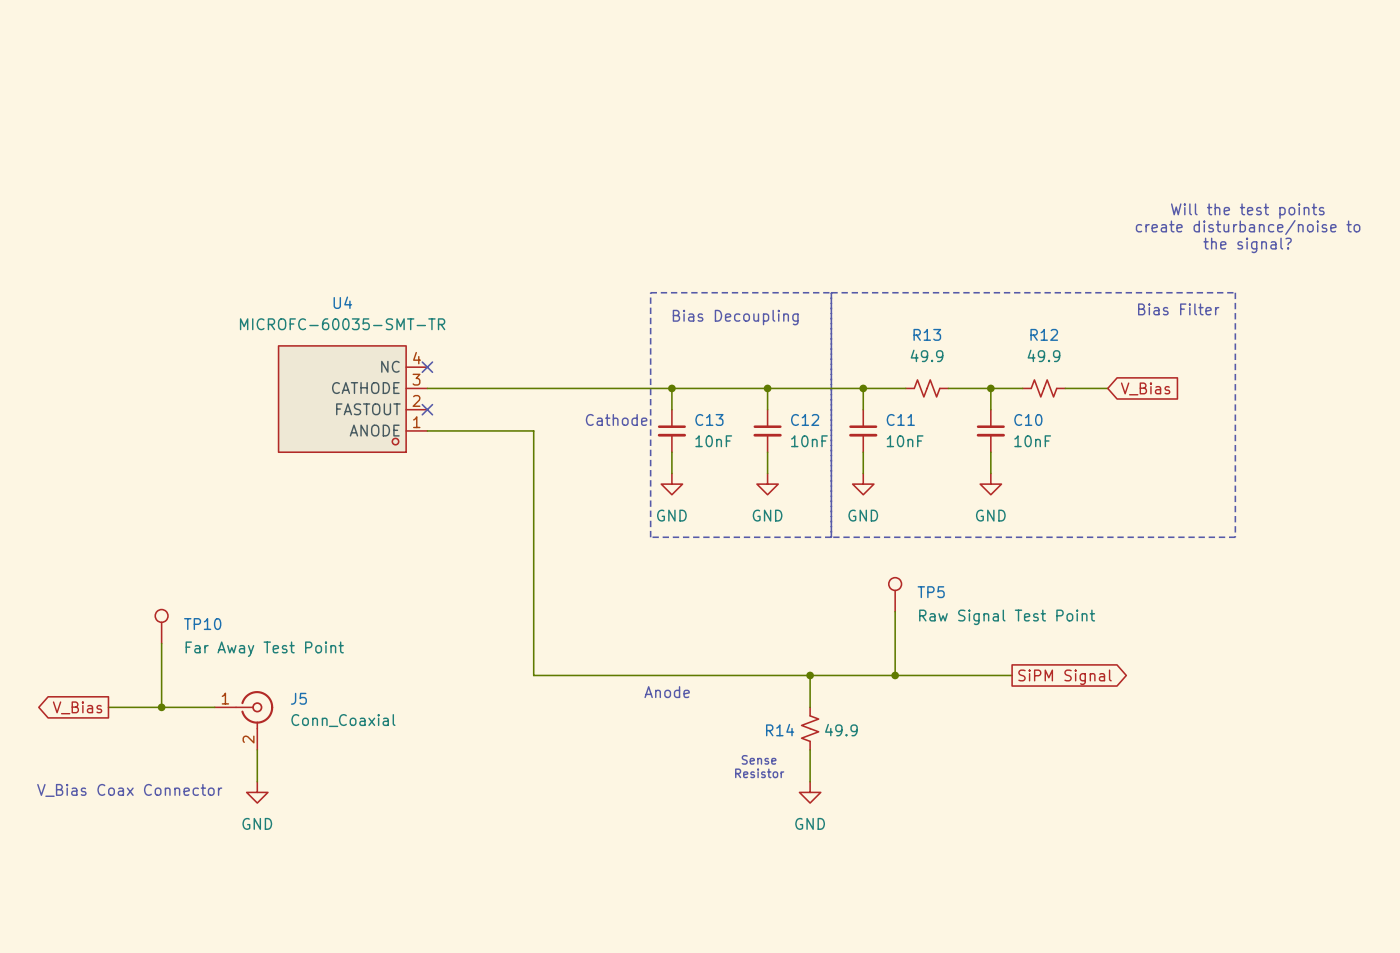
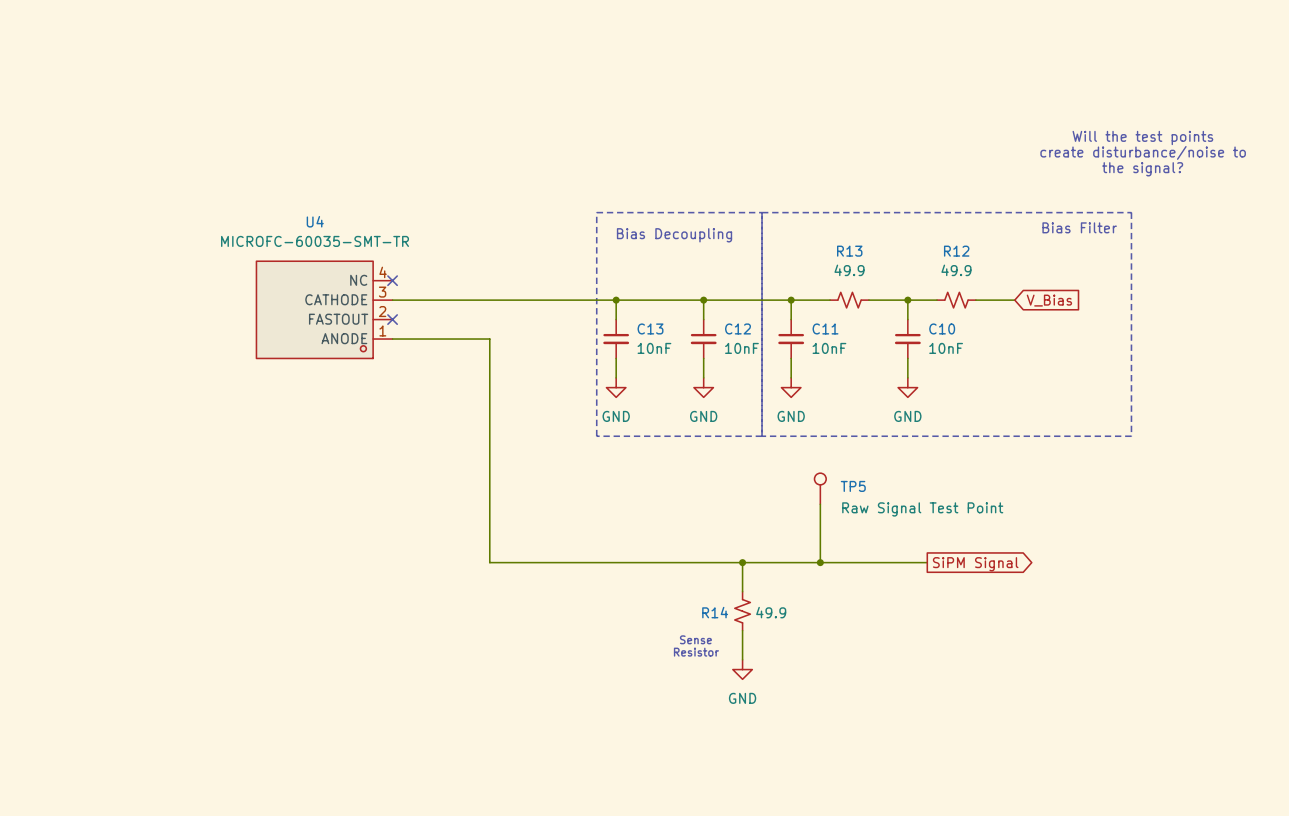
text: Cathode (616, 419) -> none
TP10: Far Away Test Point (161, 626) -> none
wire: (161, 643) (161, 707) -> none
text: Anode (667, 692) -> none
global label: V_Bias (77, 707) -> none
wire: (108, 707) (214, 707) -> none
junction: (161, 707) -> none
J5: Conn_Coaxial (244, 720) -> none
wire: (257, 749) (257, 781) -> none
text: V_Bias Coax Connector (129, 790) -> none
power symbol: GND (257, 792) -> none

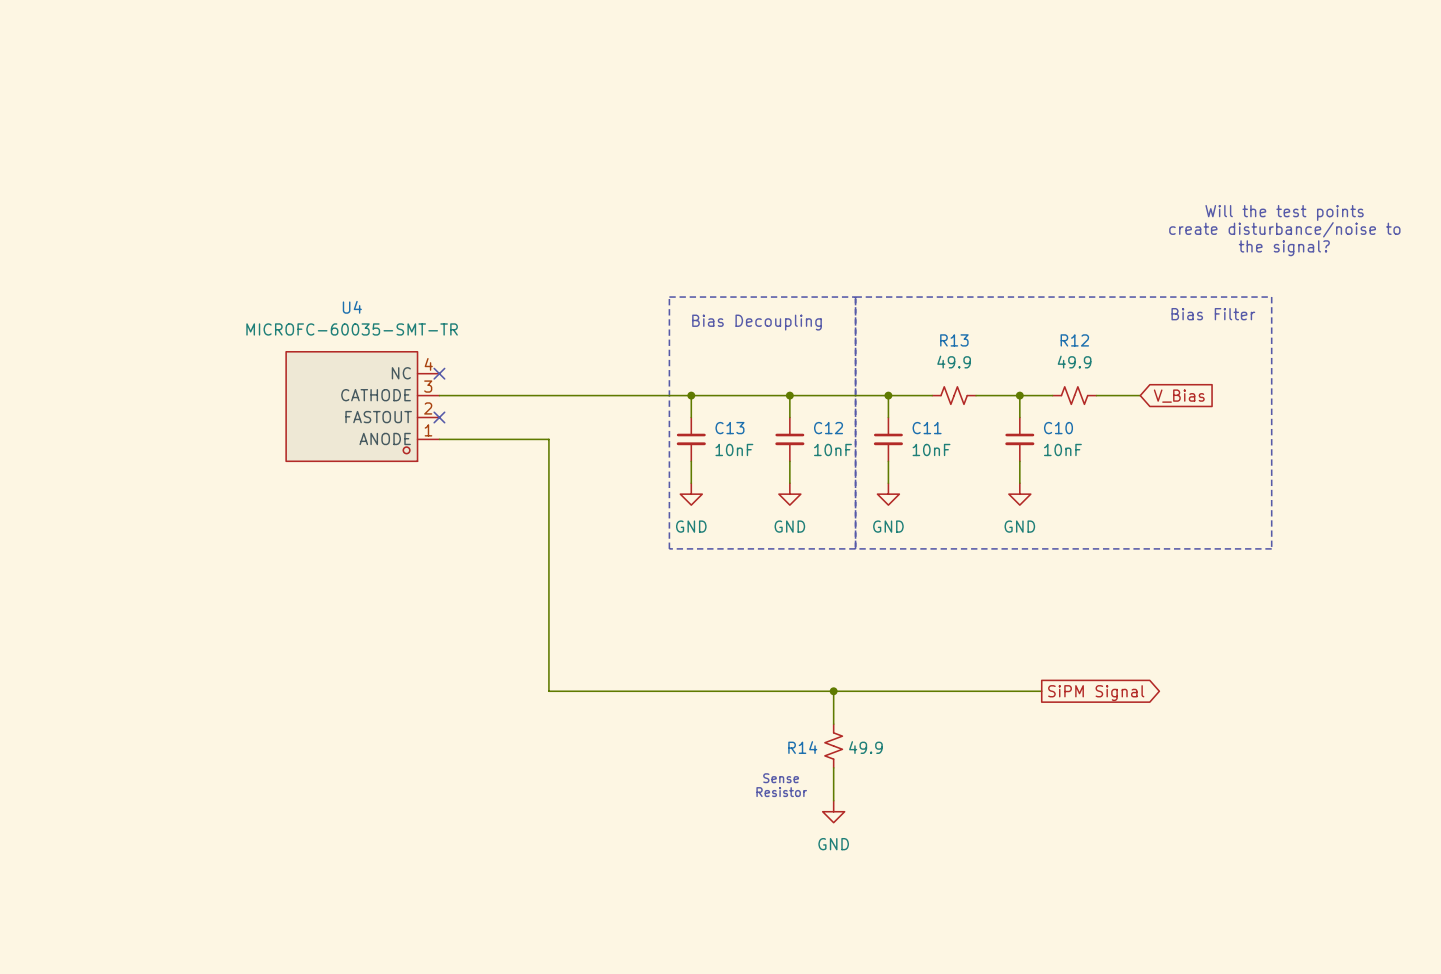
TP5: Raw Signal Test Point (820, 488) -> none
wire: (820, 504) (820, 562) -> none
junction: (820, 562) -> none

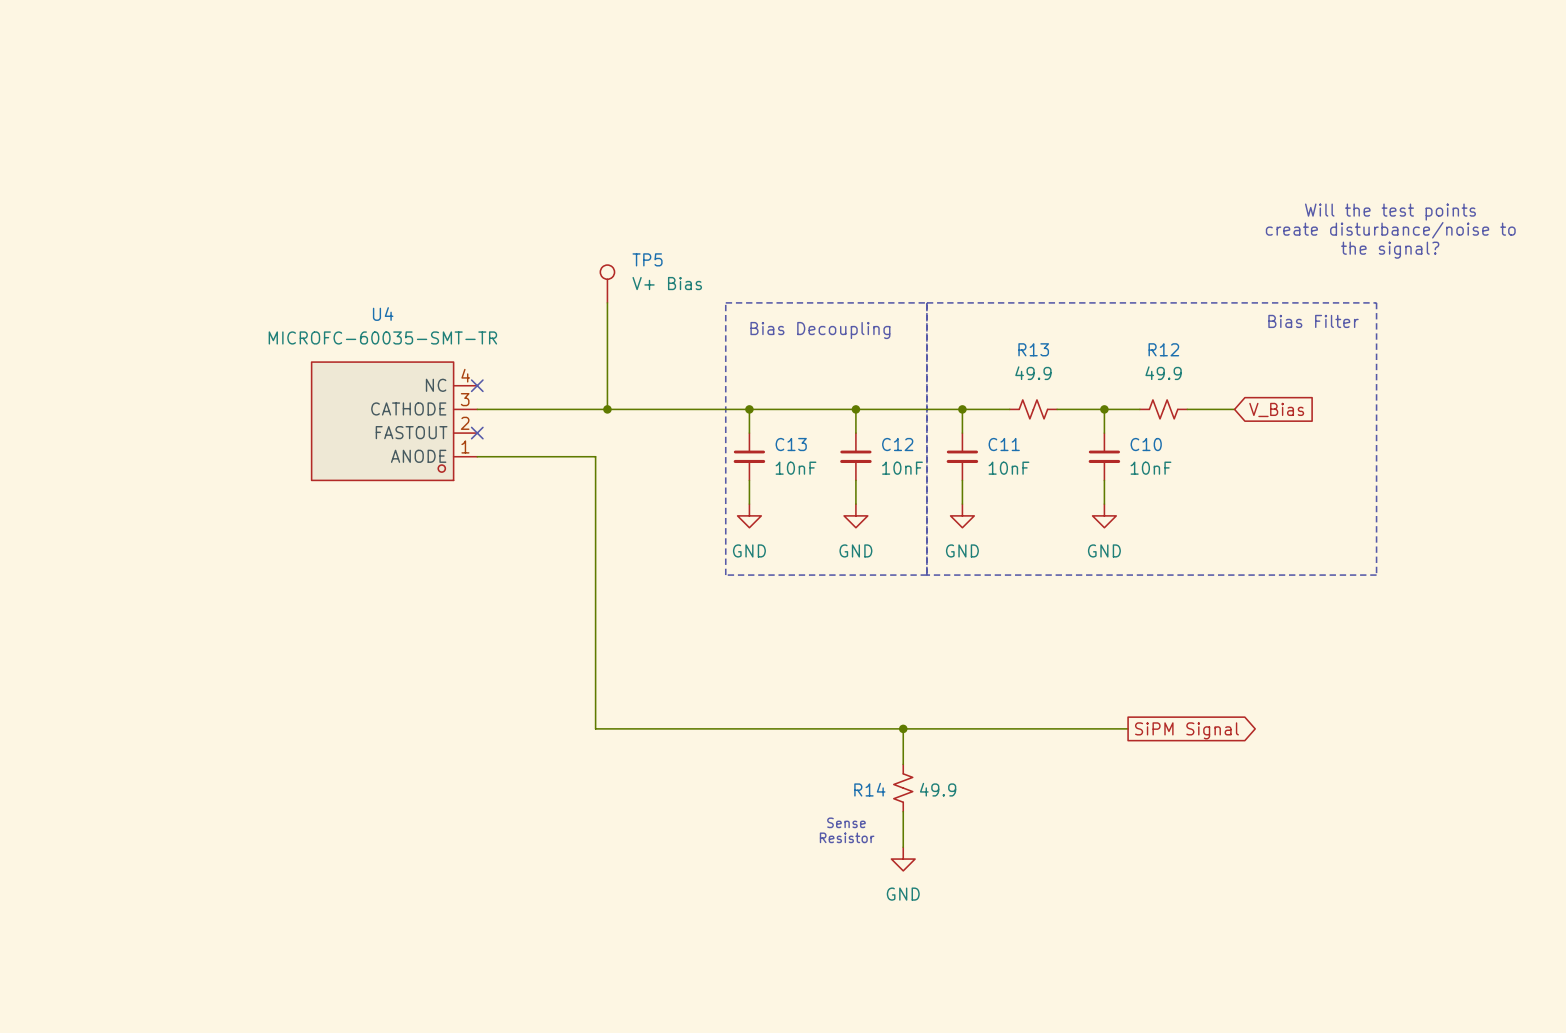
TP5: none -> V+ Bias (607, 283)
wire: none -> (607, 302) (607, 409)
junction: none -> (607, 409)

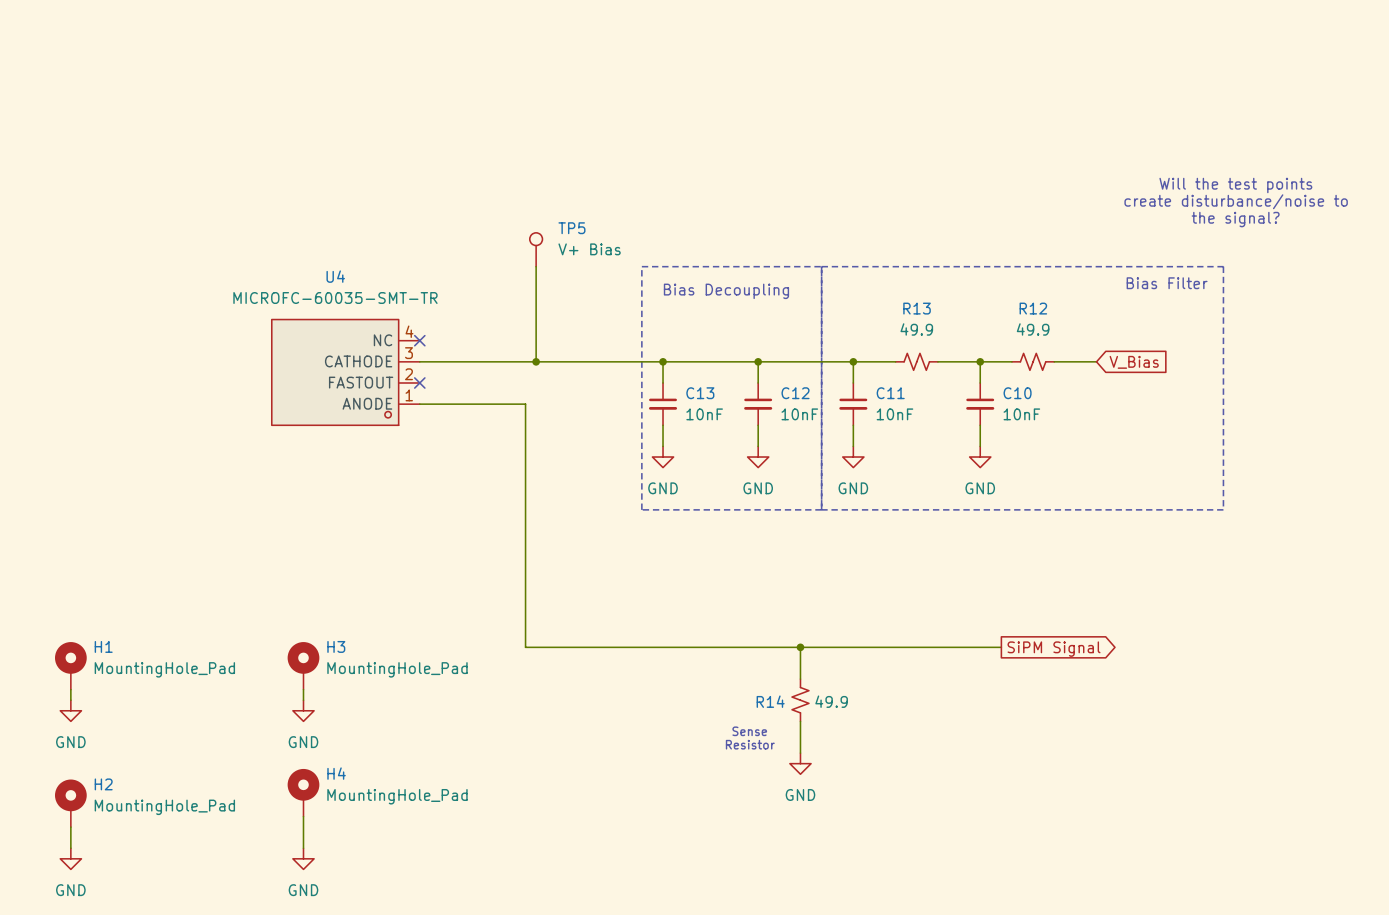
H1: none -> MountingHole_Pad (70, 665)
H3: none -> MountingHole_Pad (303, 665)
wire: none -> (70, 689) (70, 700)
wire: none -> (303, 689) (303, 700)
power symbol: none -> GND (70, 710)
power symbol: none -> GND (303, 710)
H4: none -> MountingHole_Pad (303, 792)
H2: none -> MountingHole_Pad (70, 803)
wire: none -> (303, 816) (303, 848)
wire: none -> (70, 827) (70, 848)
power symbol: none -> GND (70, 858)
power symbol: none -> GND (303, 858)

